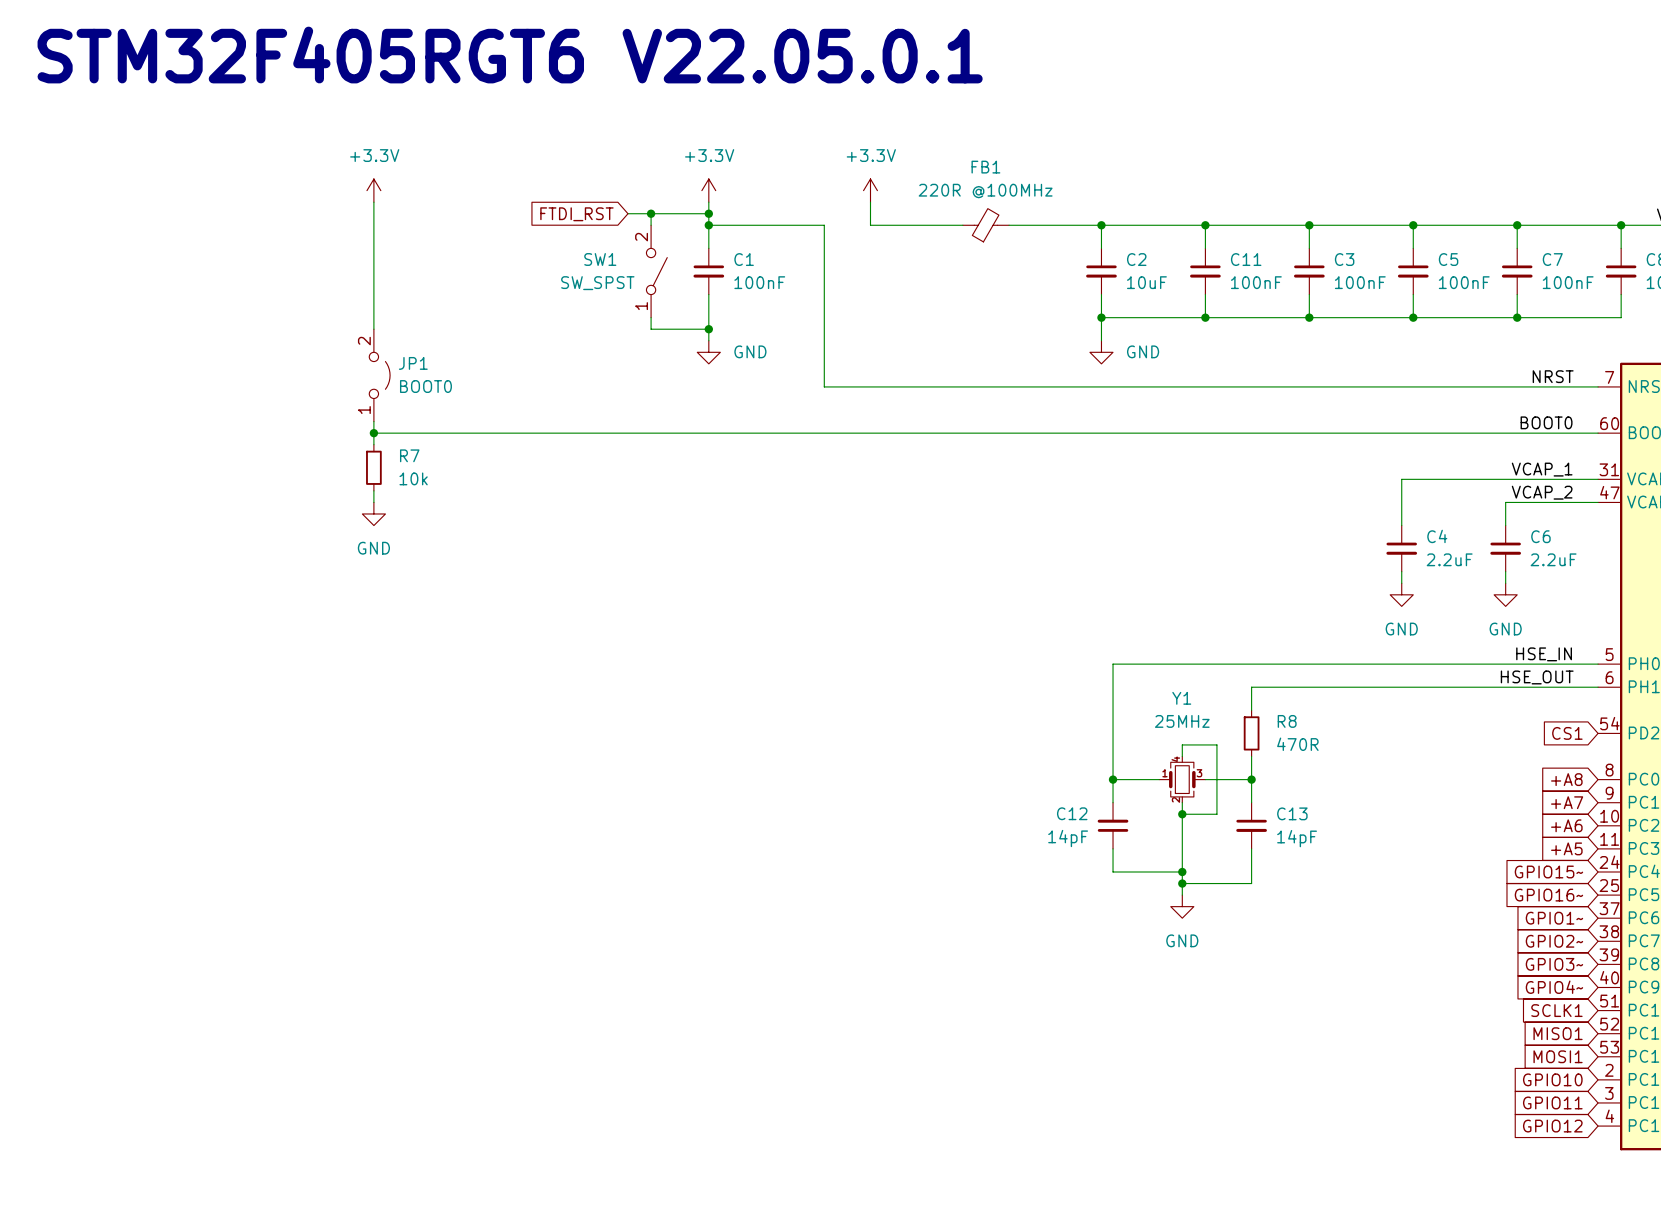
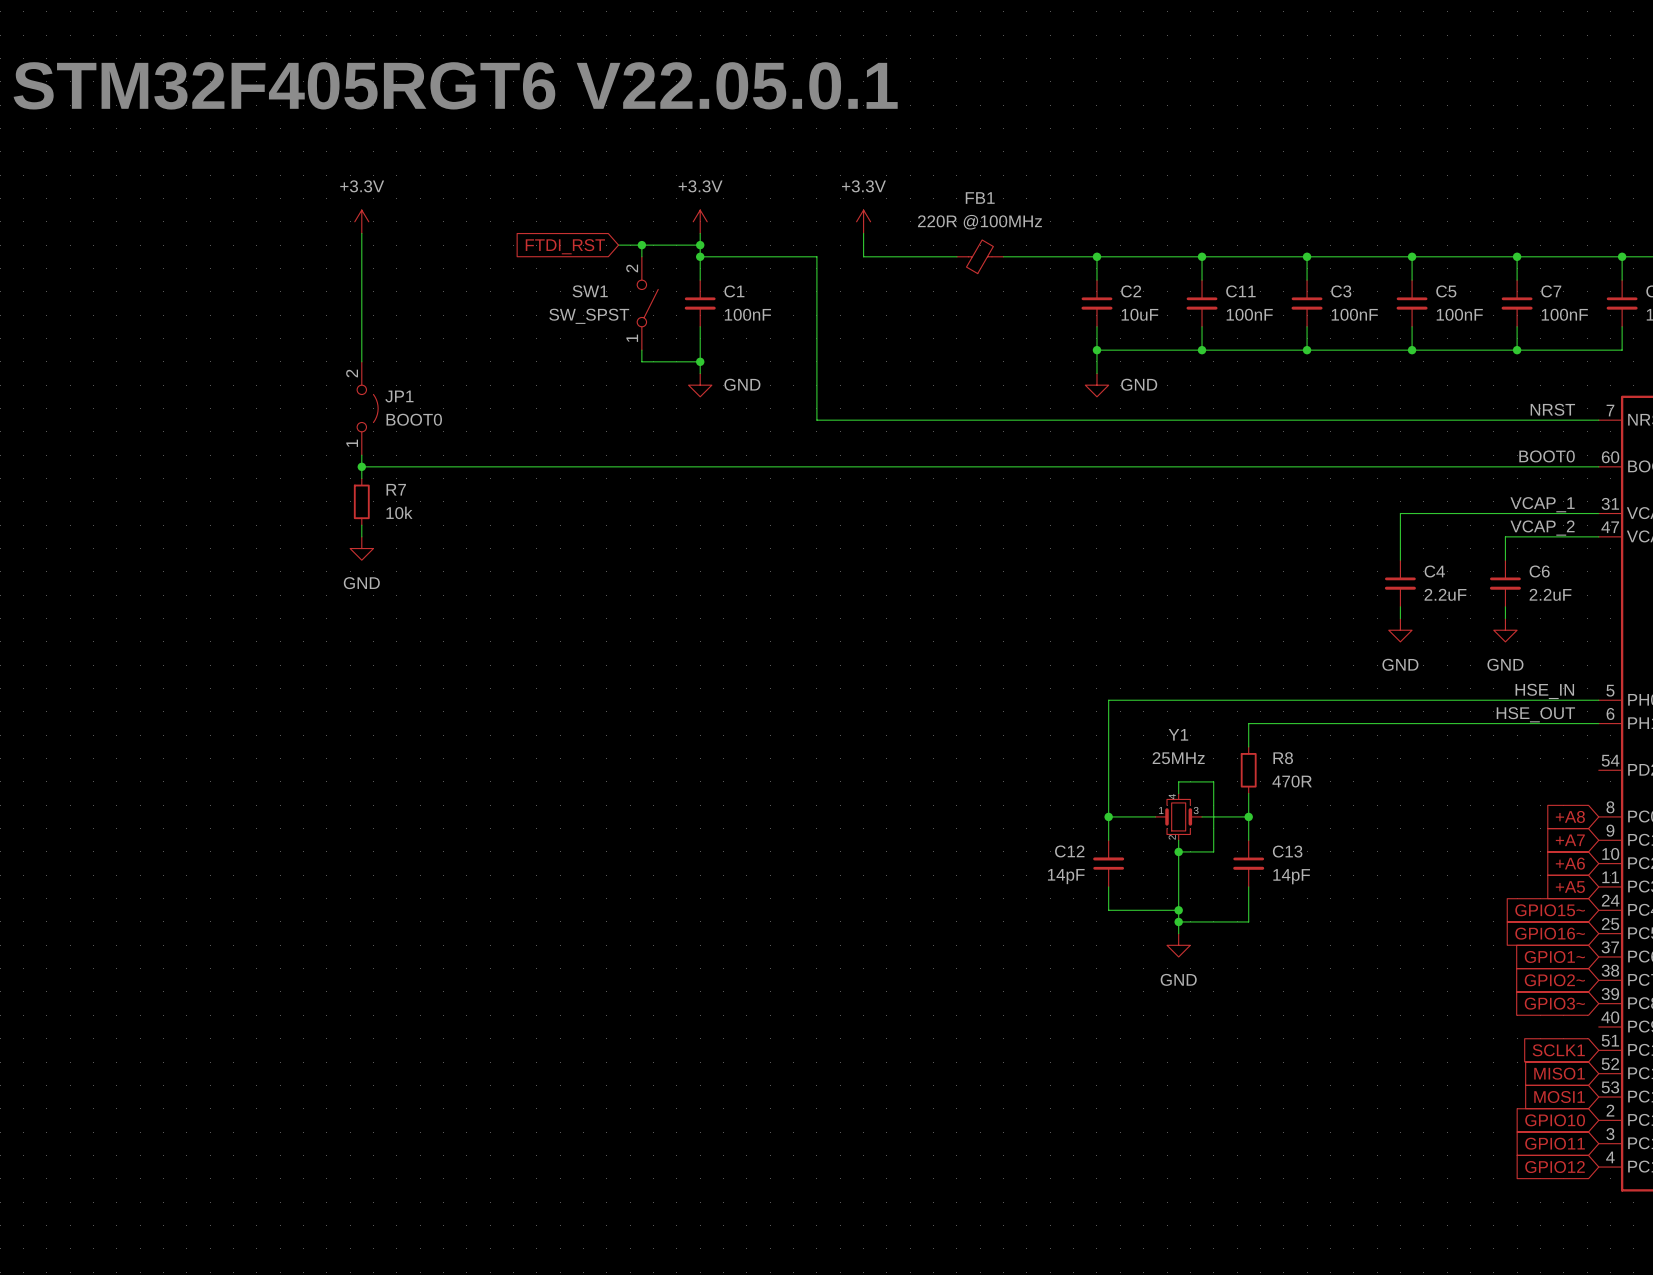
global label: CS1 (1567, 733) -> none
global label: GPIO4~ (1554, 987) -> none

